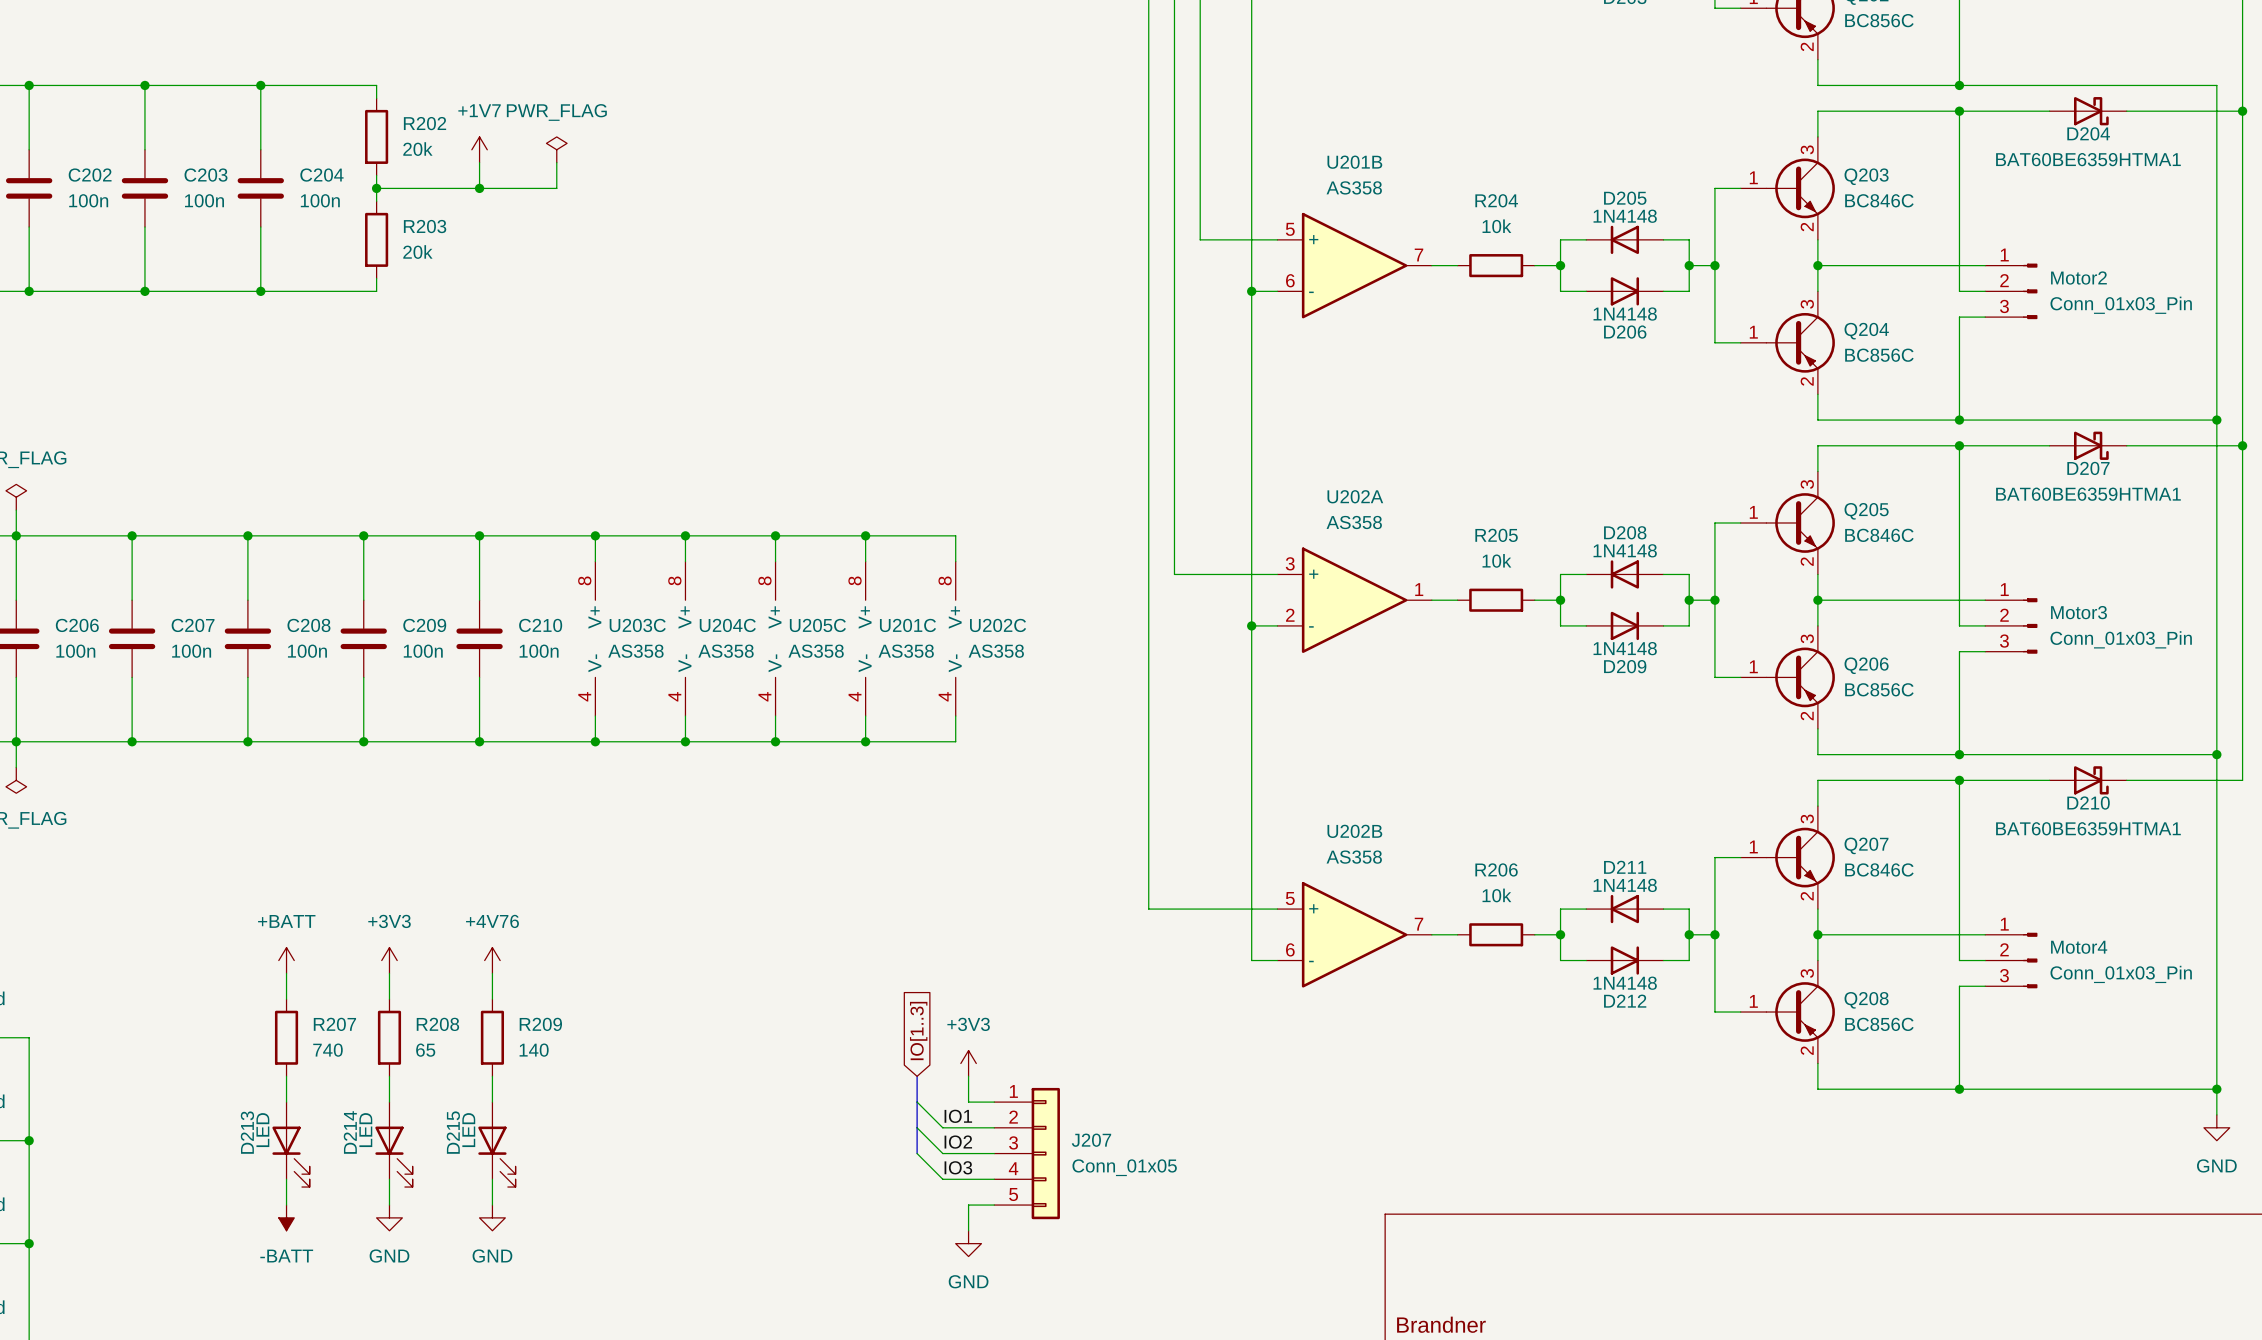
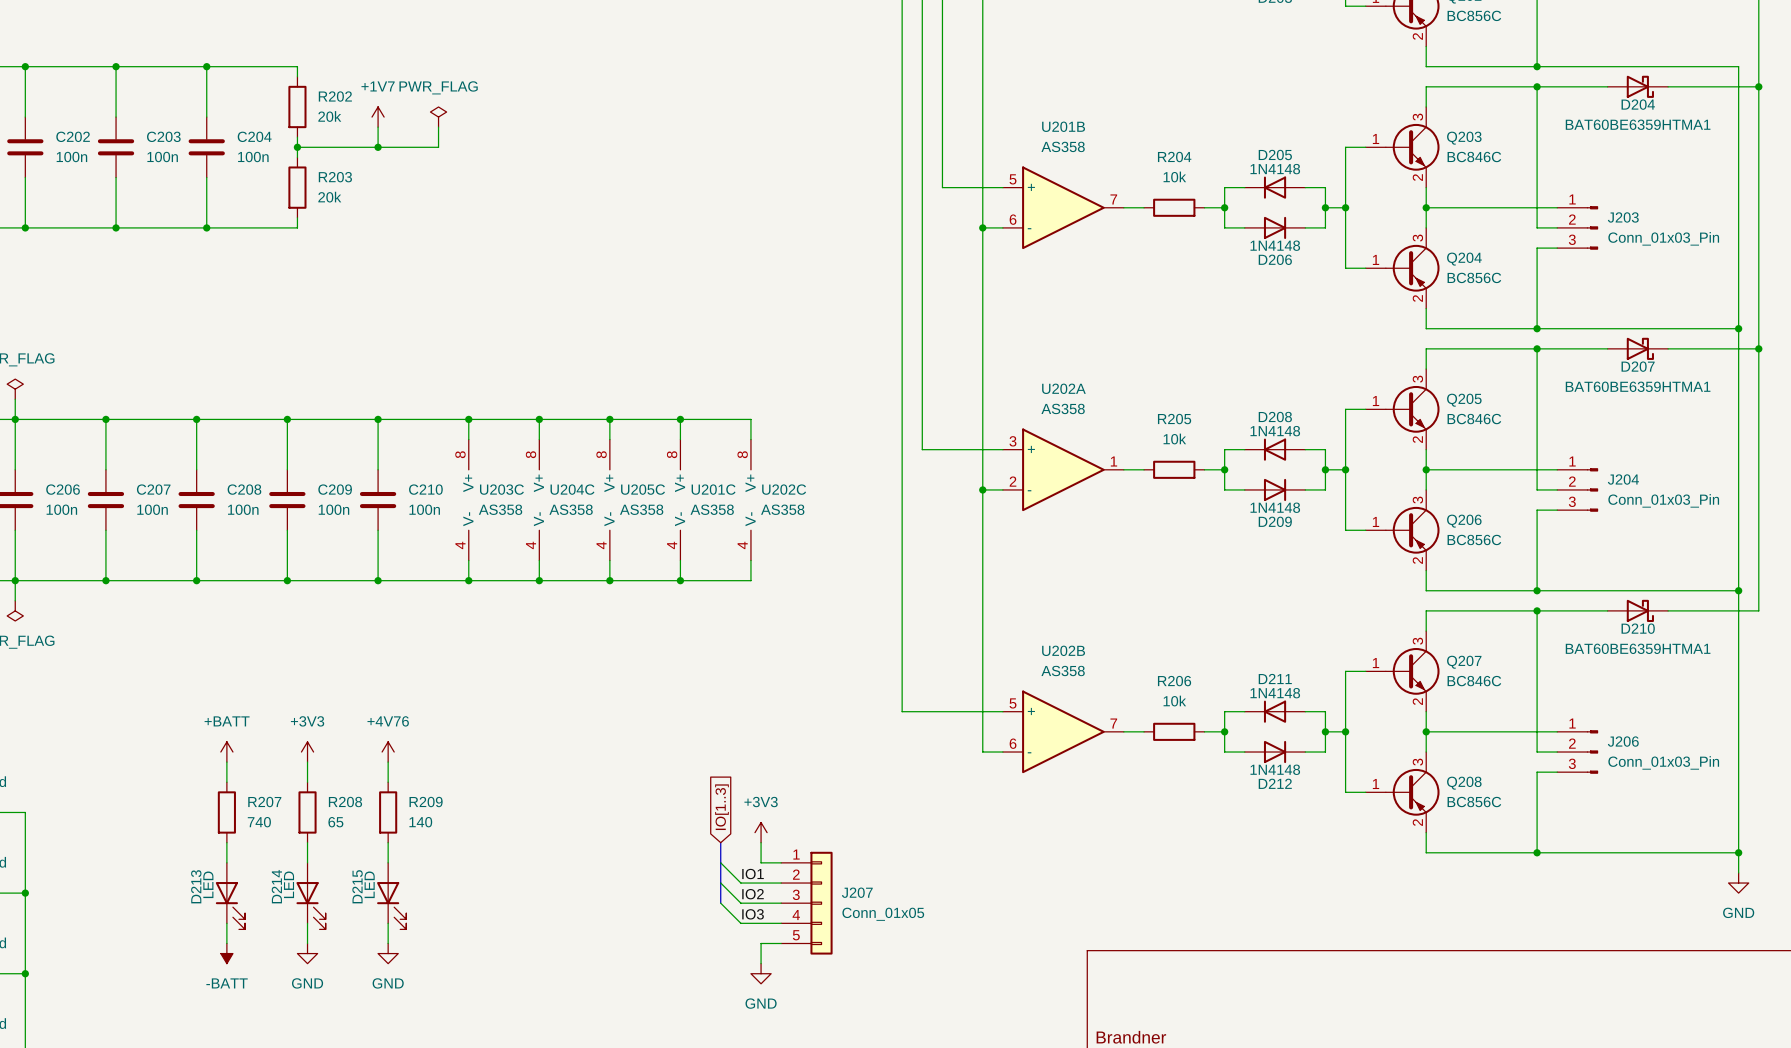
Motor2 name: Motor2 (2078, 278) -> J203 (1623, 217)
Motor3 name: Motor3 (2079, 612) -> J204 (1623, 479)
Motor4 name: Motor4 (2079, 947) -> J206 (1623, 741)

